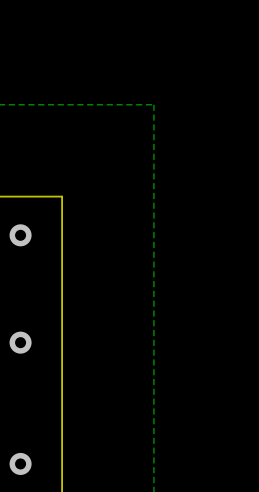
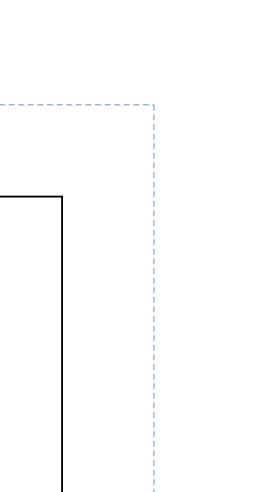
via: (20, 235) -> none
via: (20, 342) -> none
via: (20, 463) -> none

